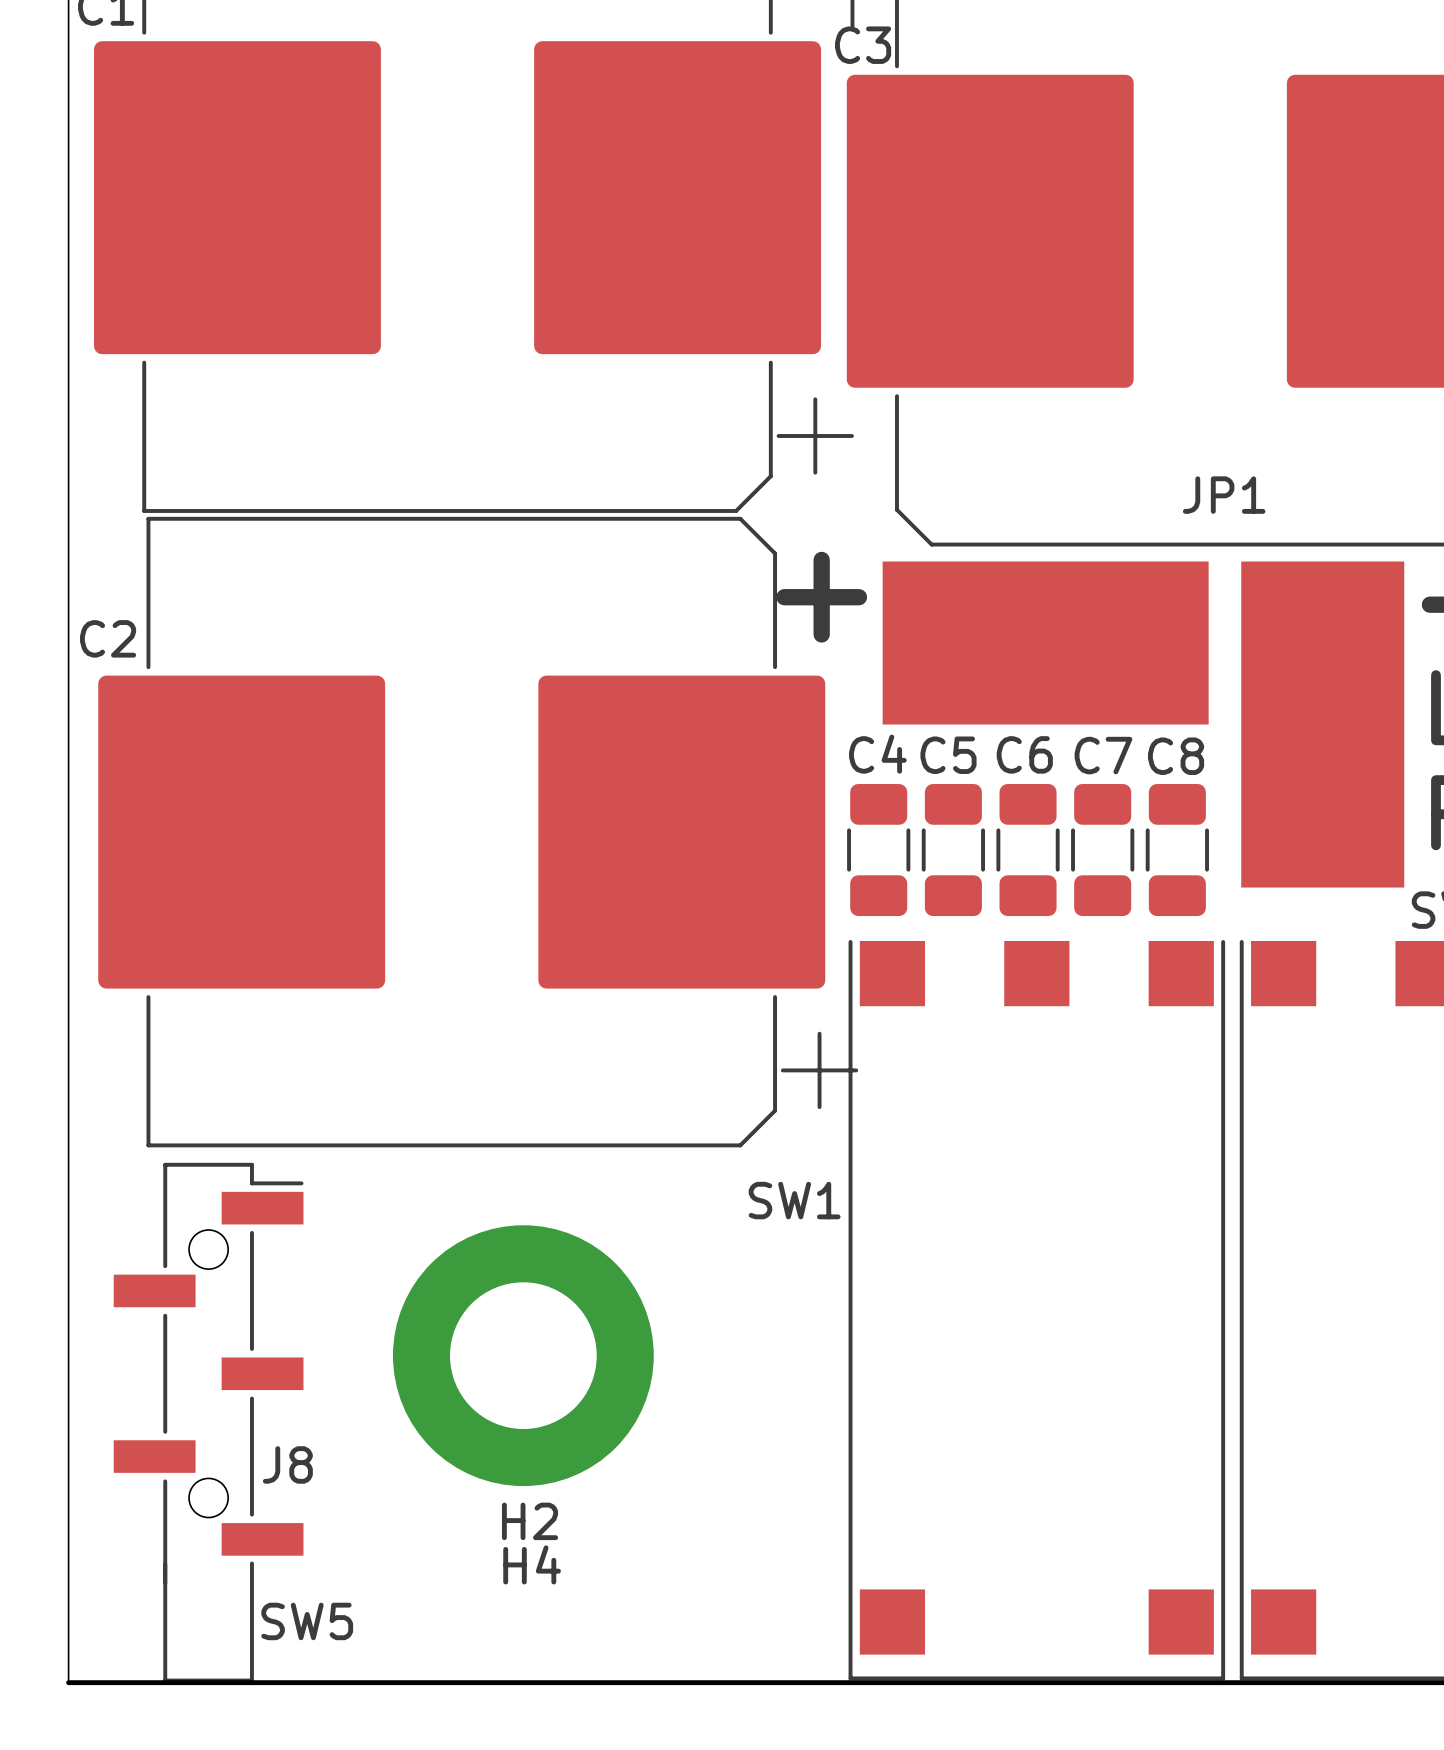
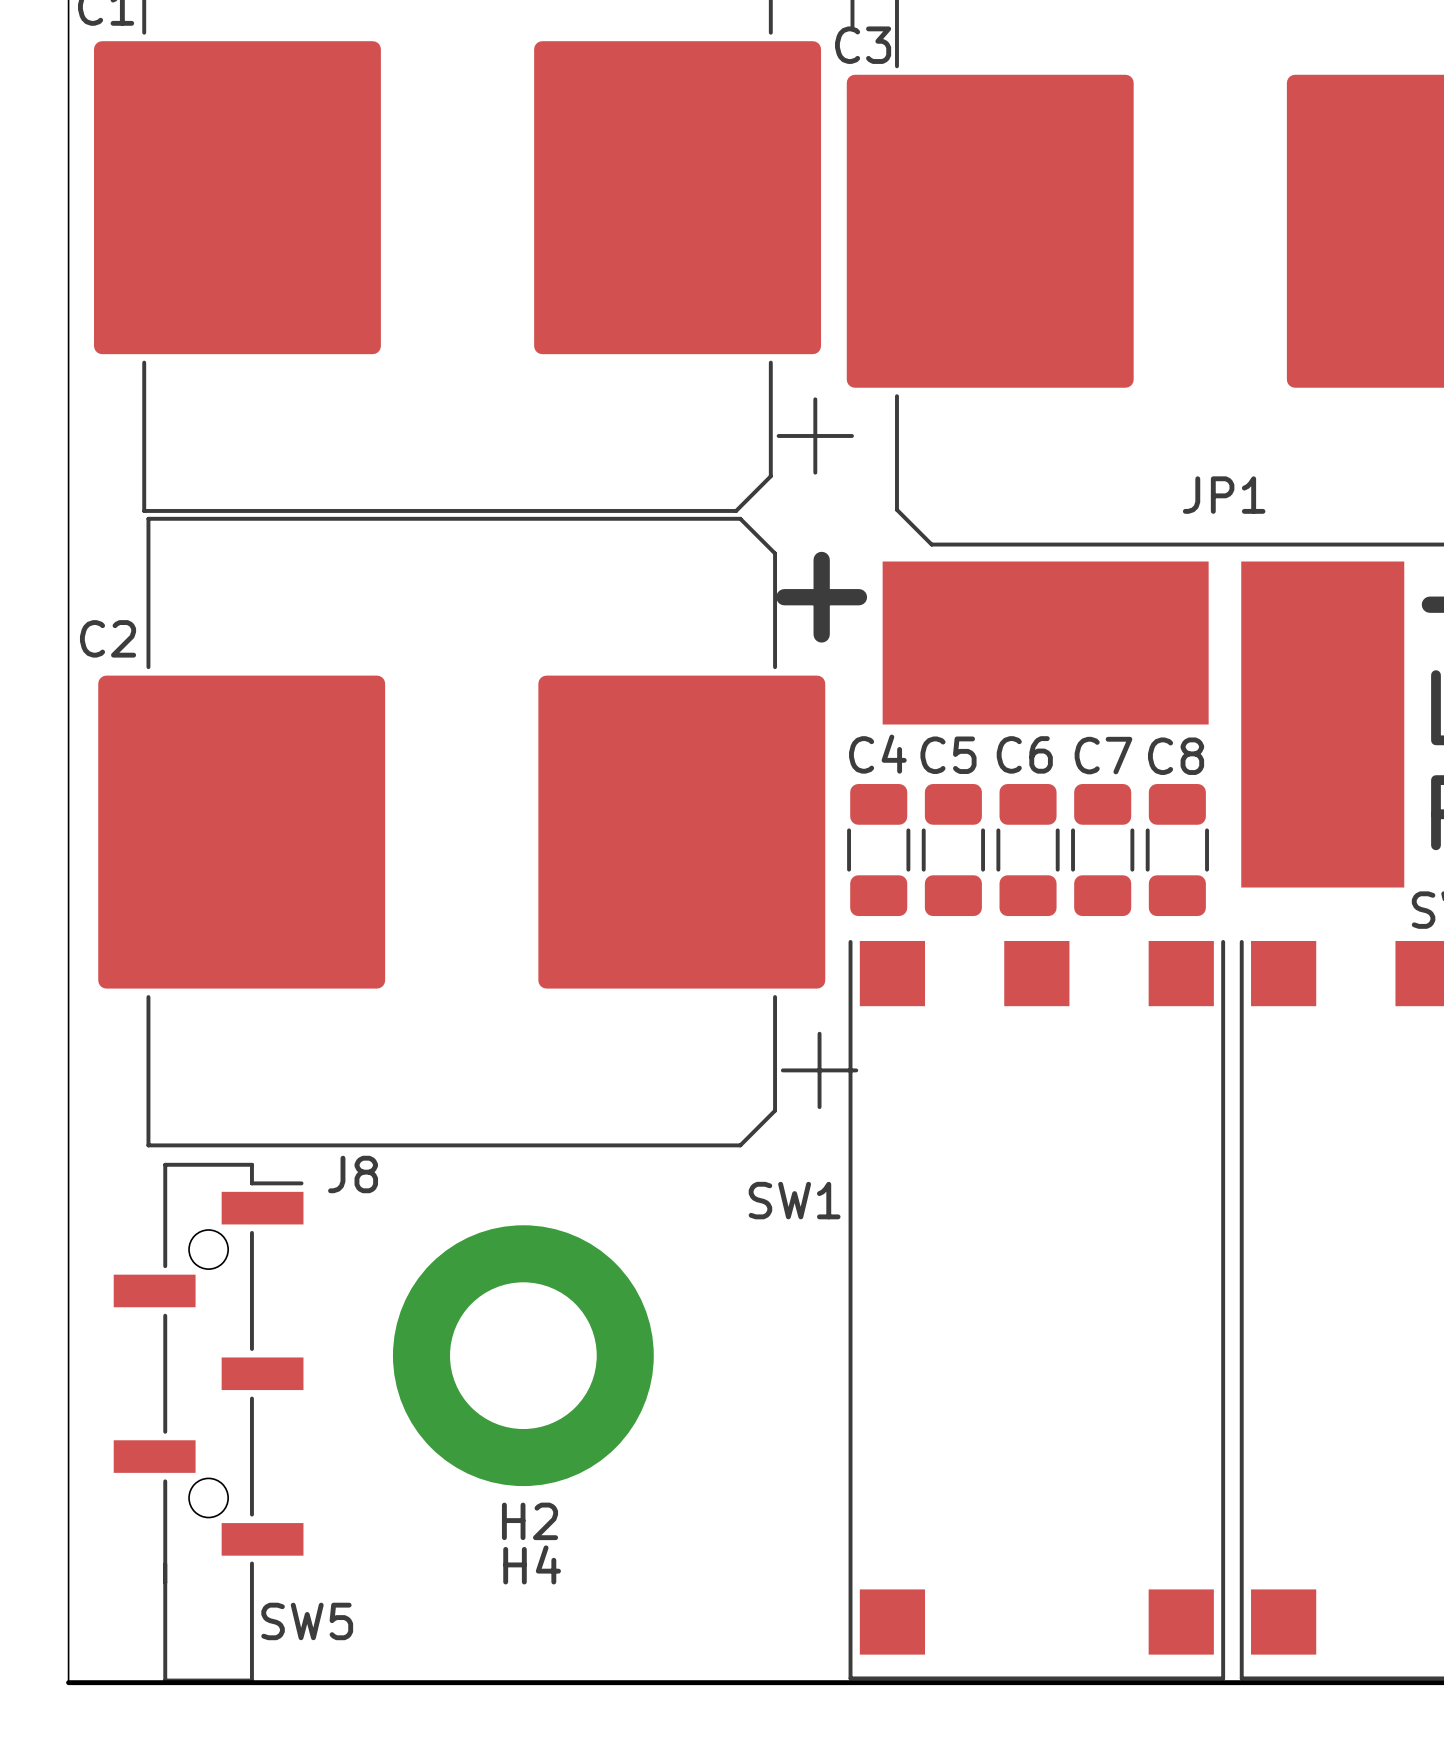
J8 position: (287, 1464) -> (353, 1174)

